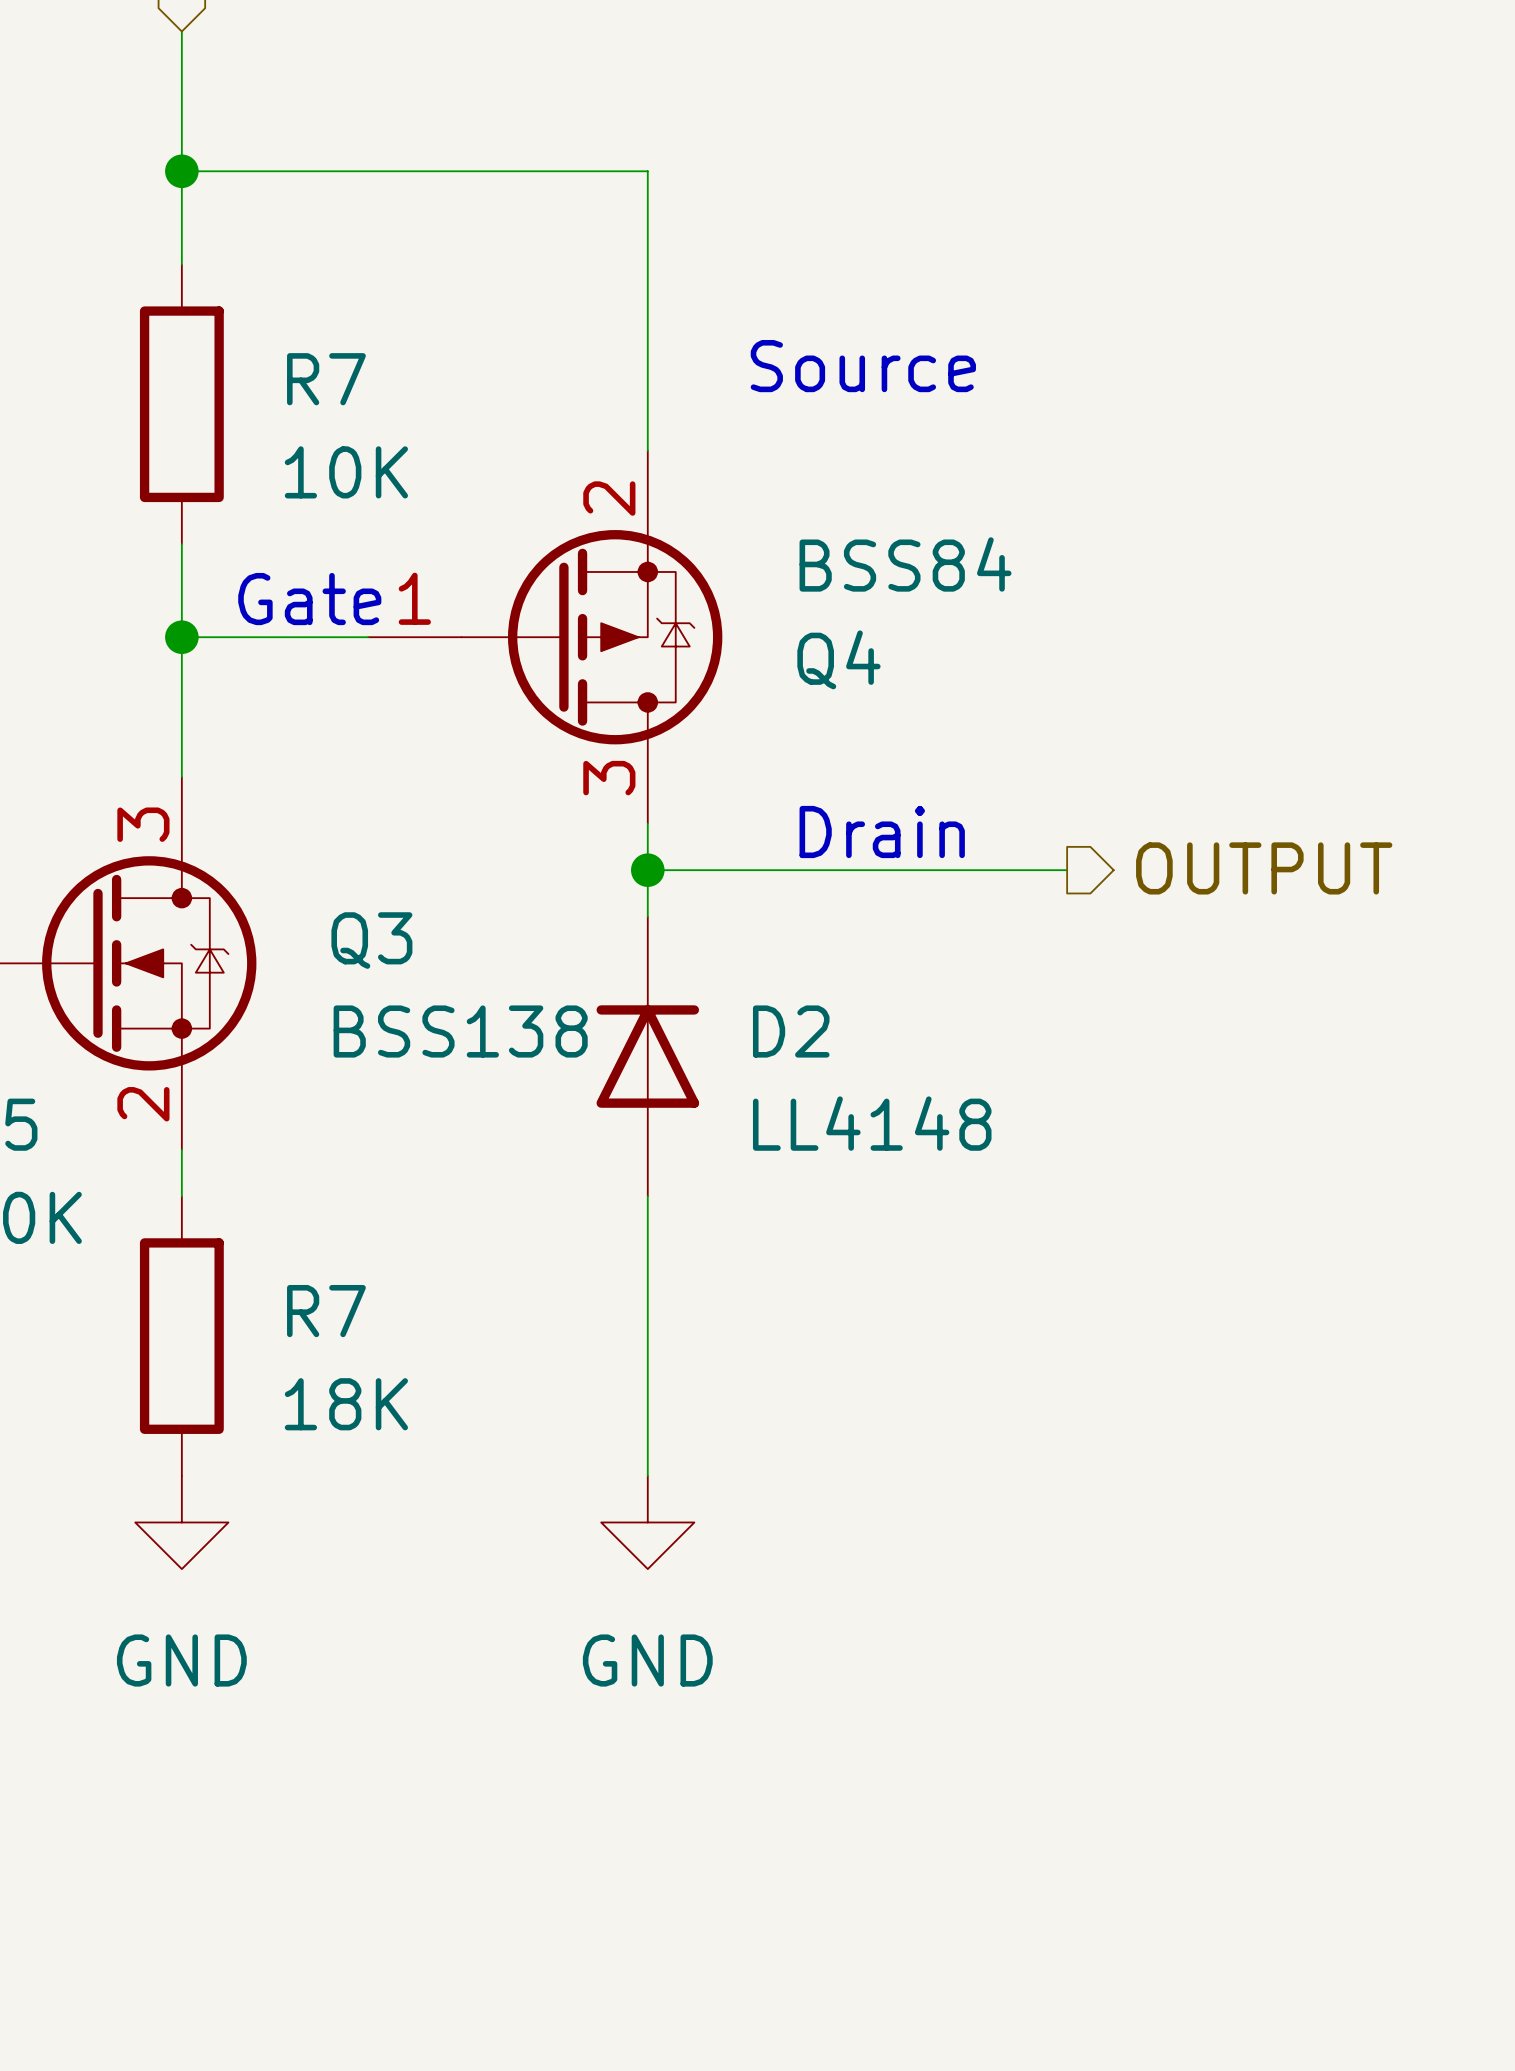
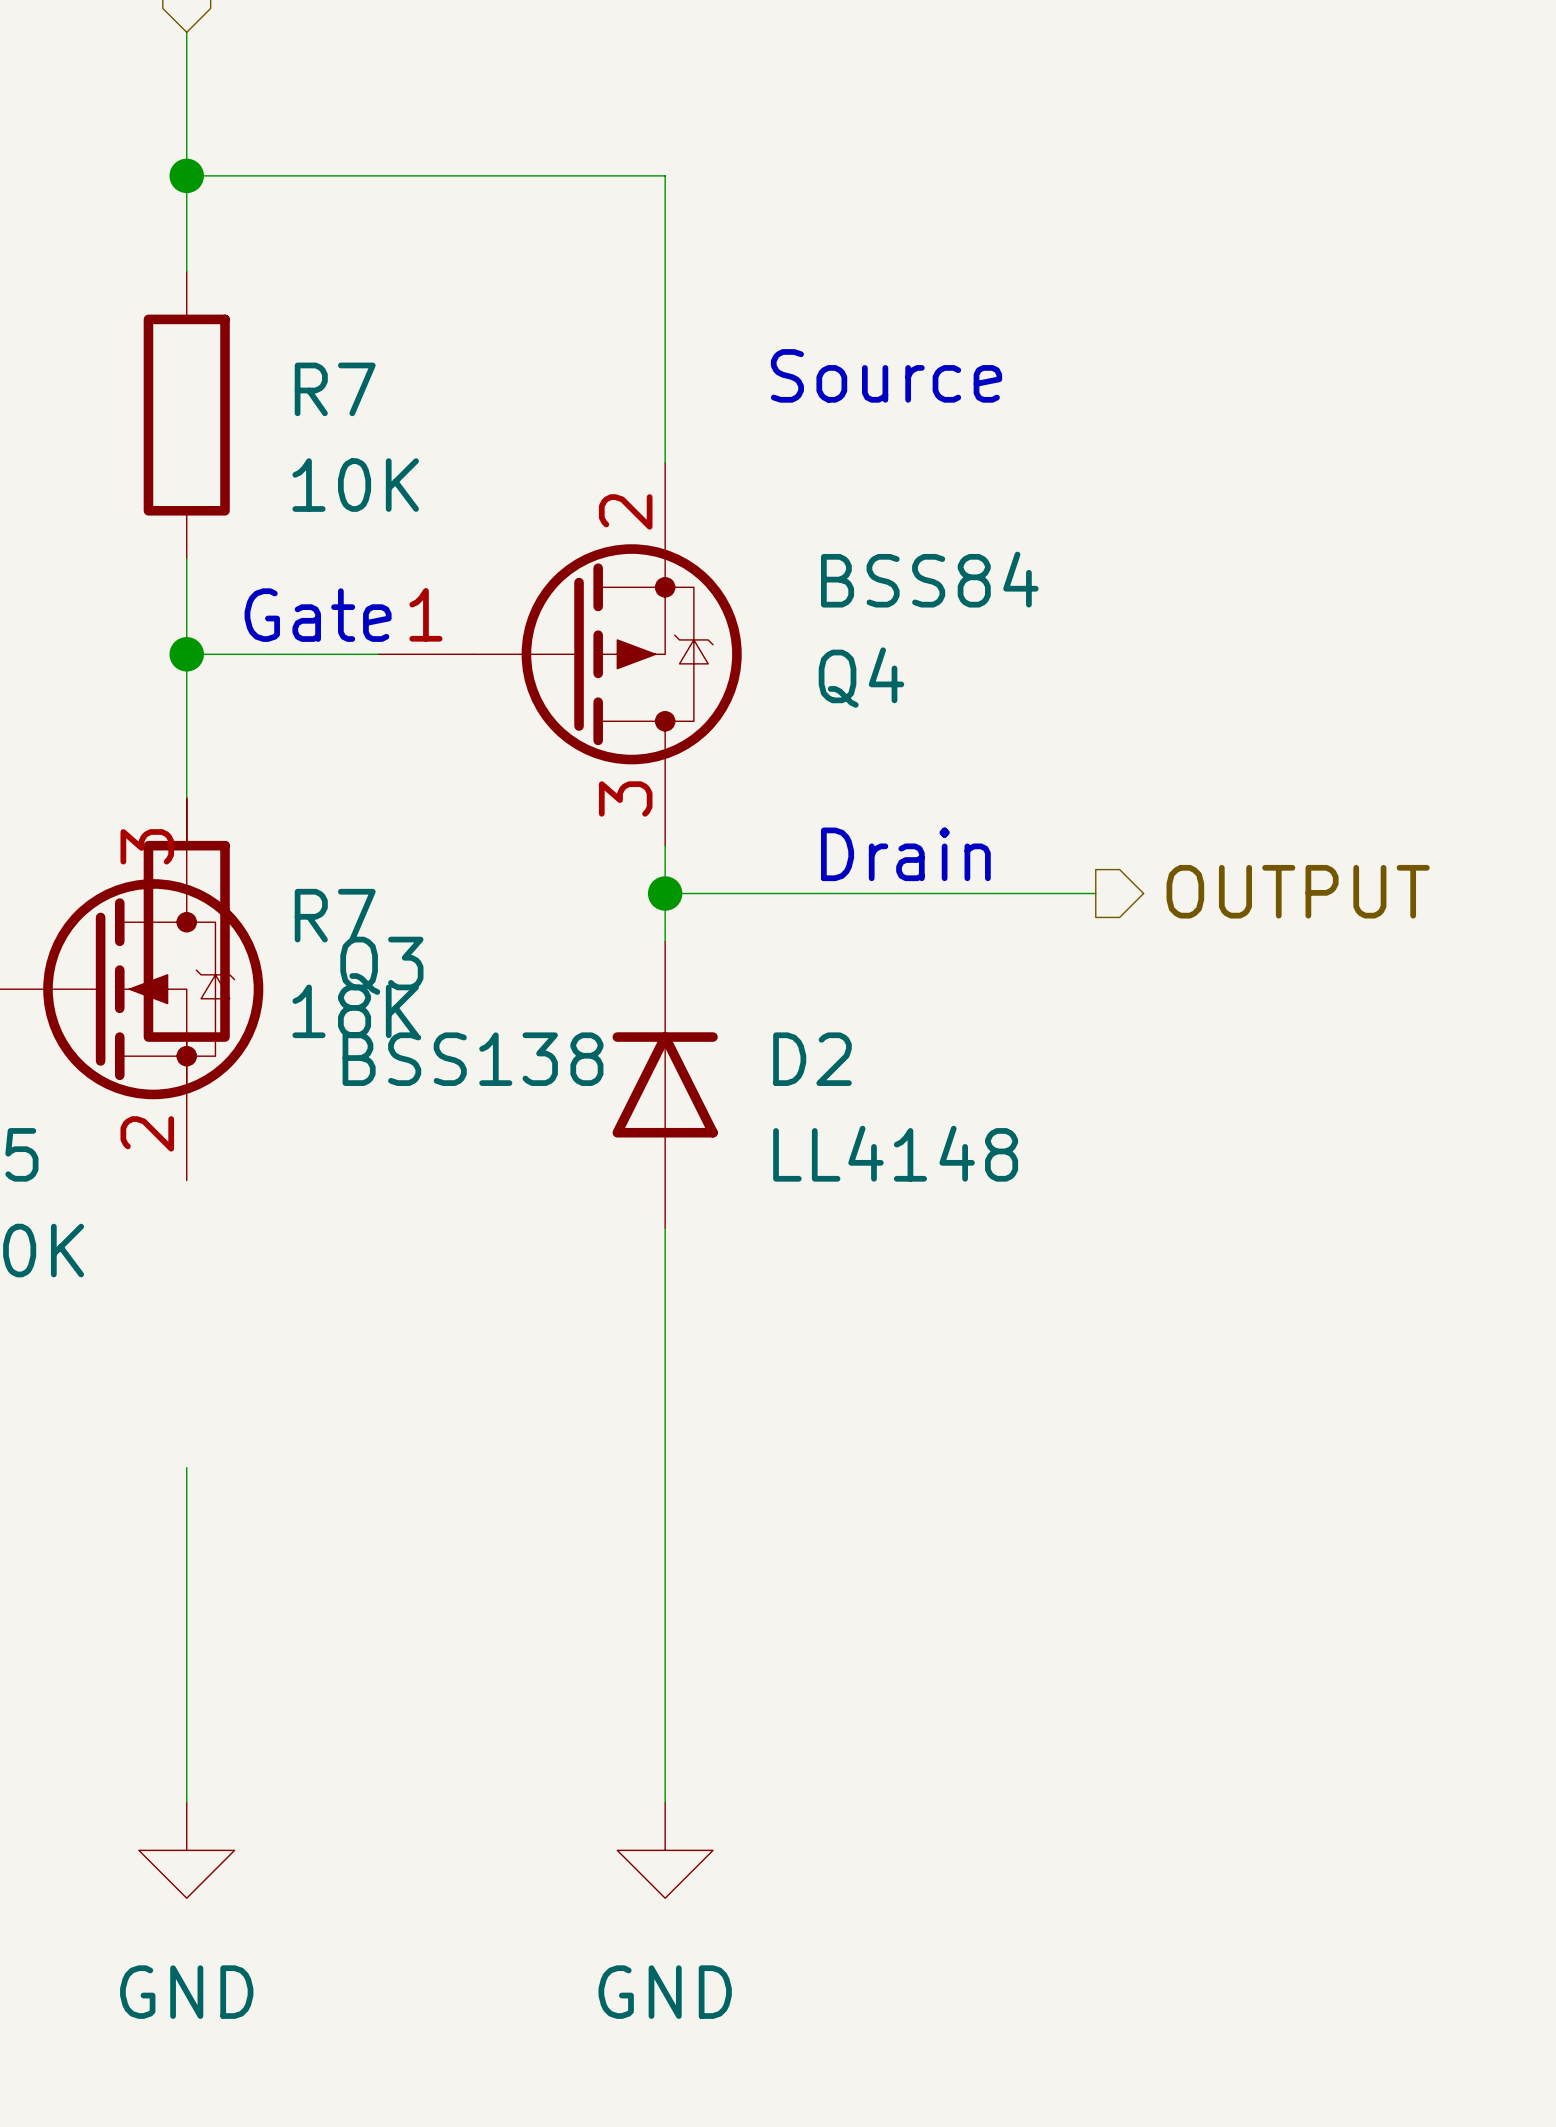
wire: (181, 1149) (181, 1196) -> none
R7 position: (181, 1336) -> (186, 941)
wire: none -> (186, 1467) (186, 1802)
wire: none -> (665, 1515) (665, 1802)
power symbol: GND (181, 1522) -> none
power symbol: GND (647, 1522) -> none
power symbol: none -> GND (186, 1850)
power symbol: none -> GND (665, 1850)

